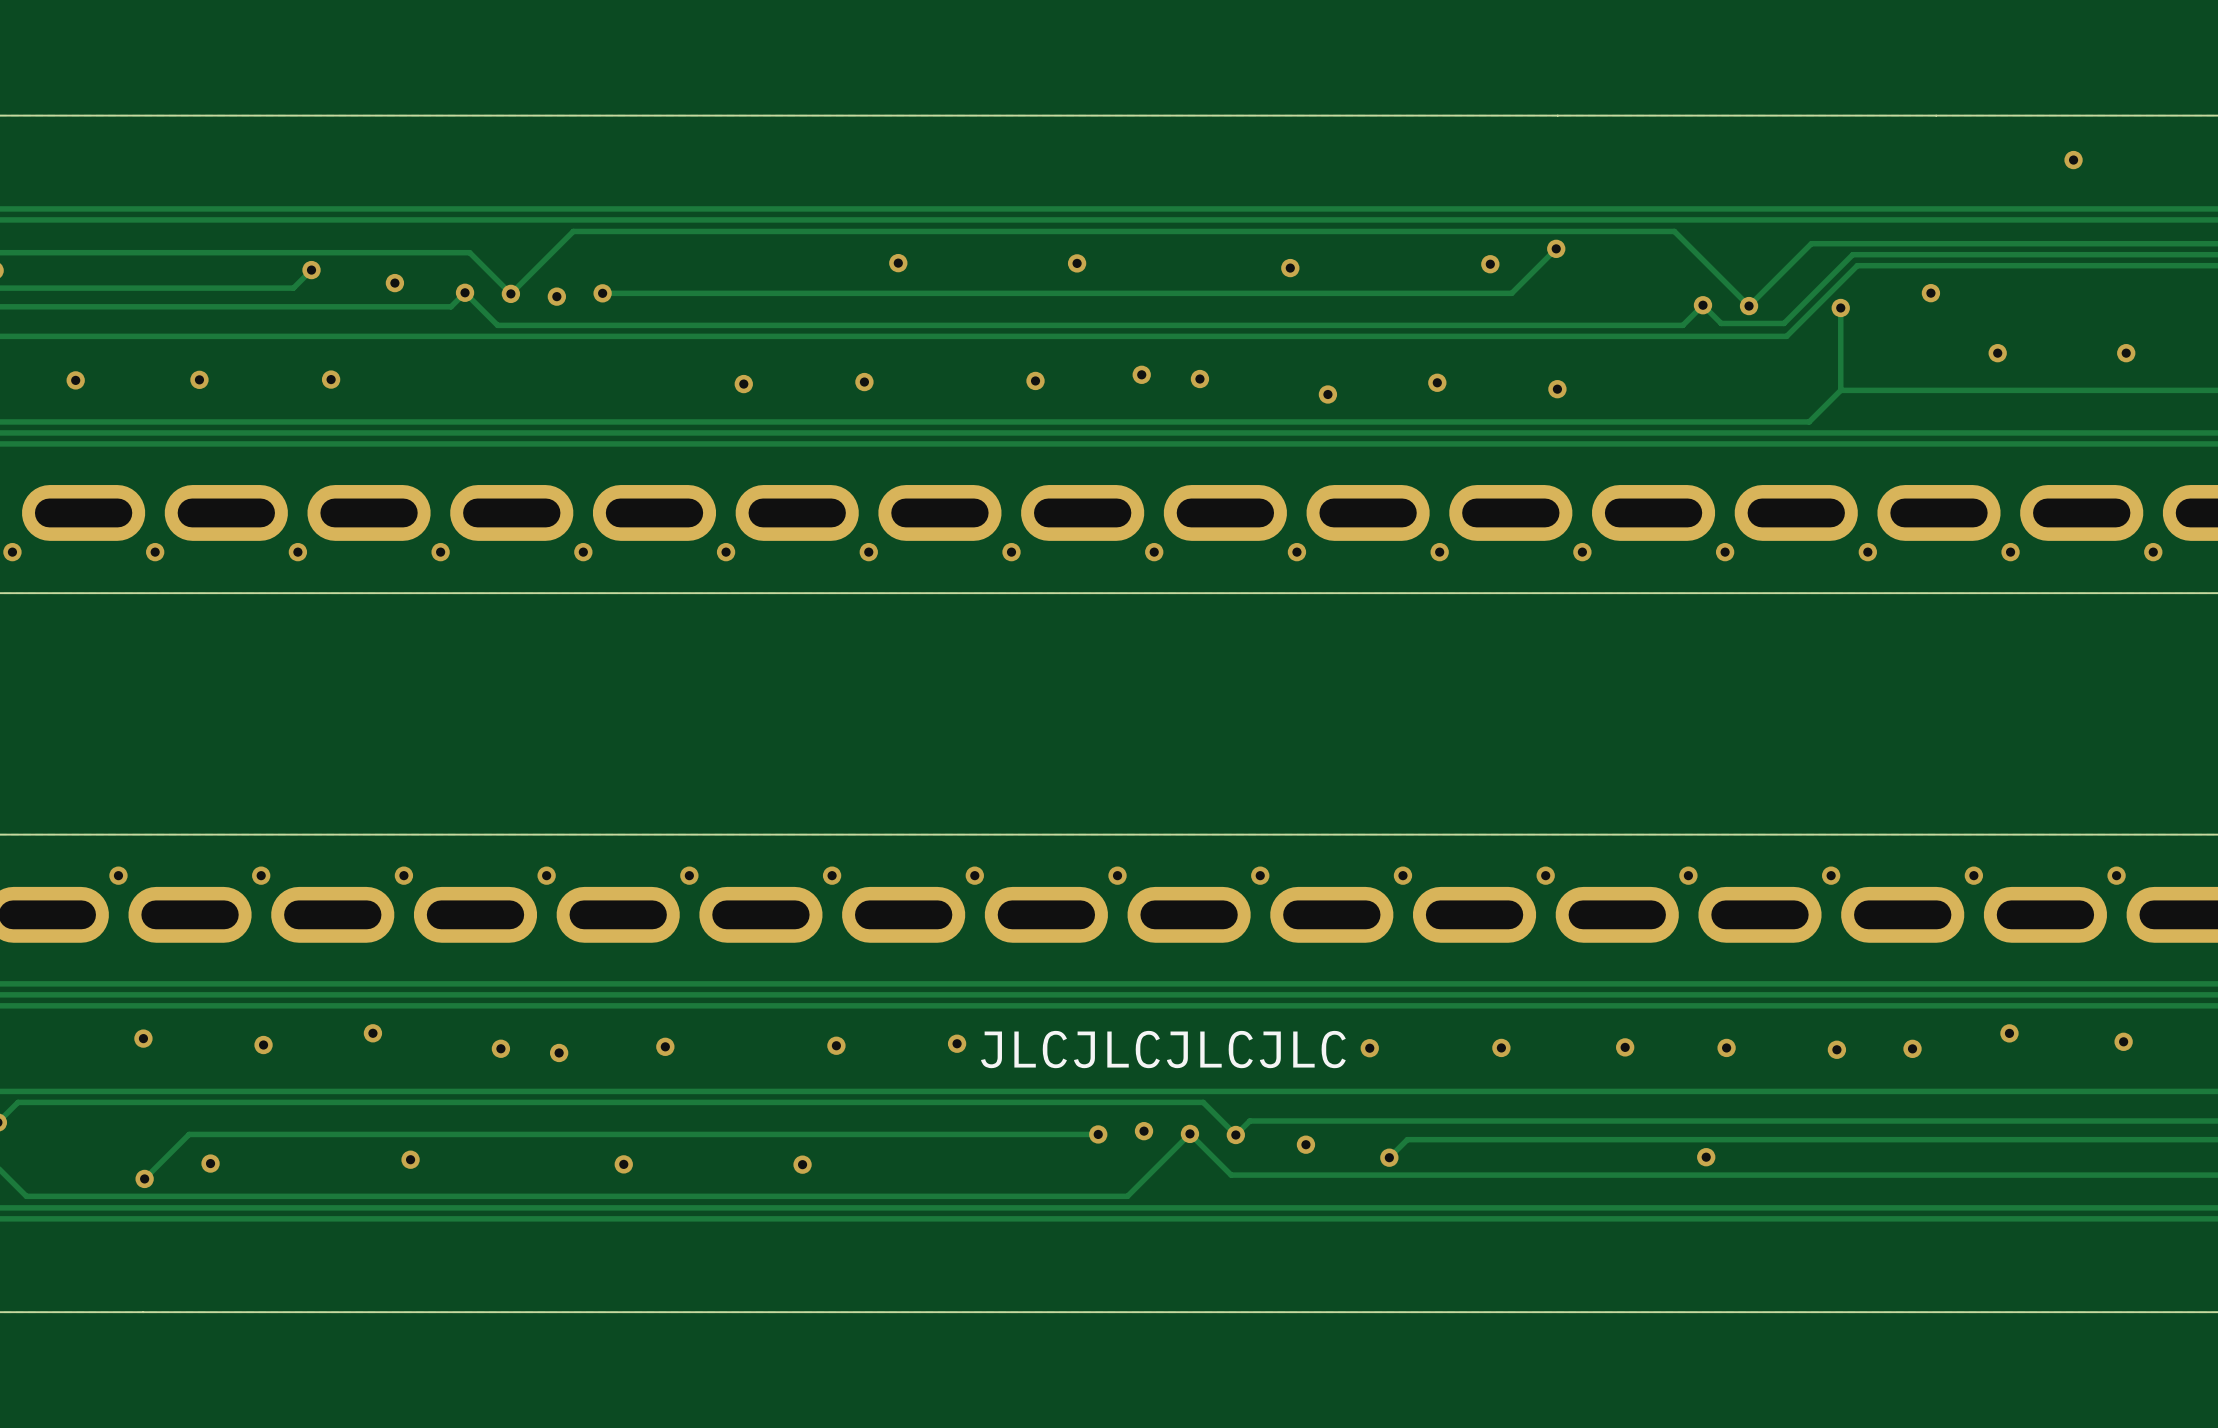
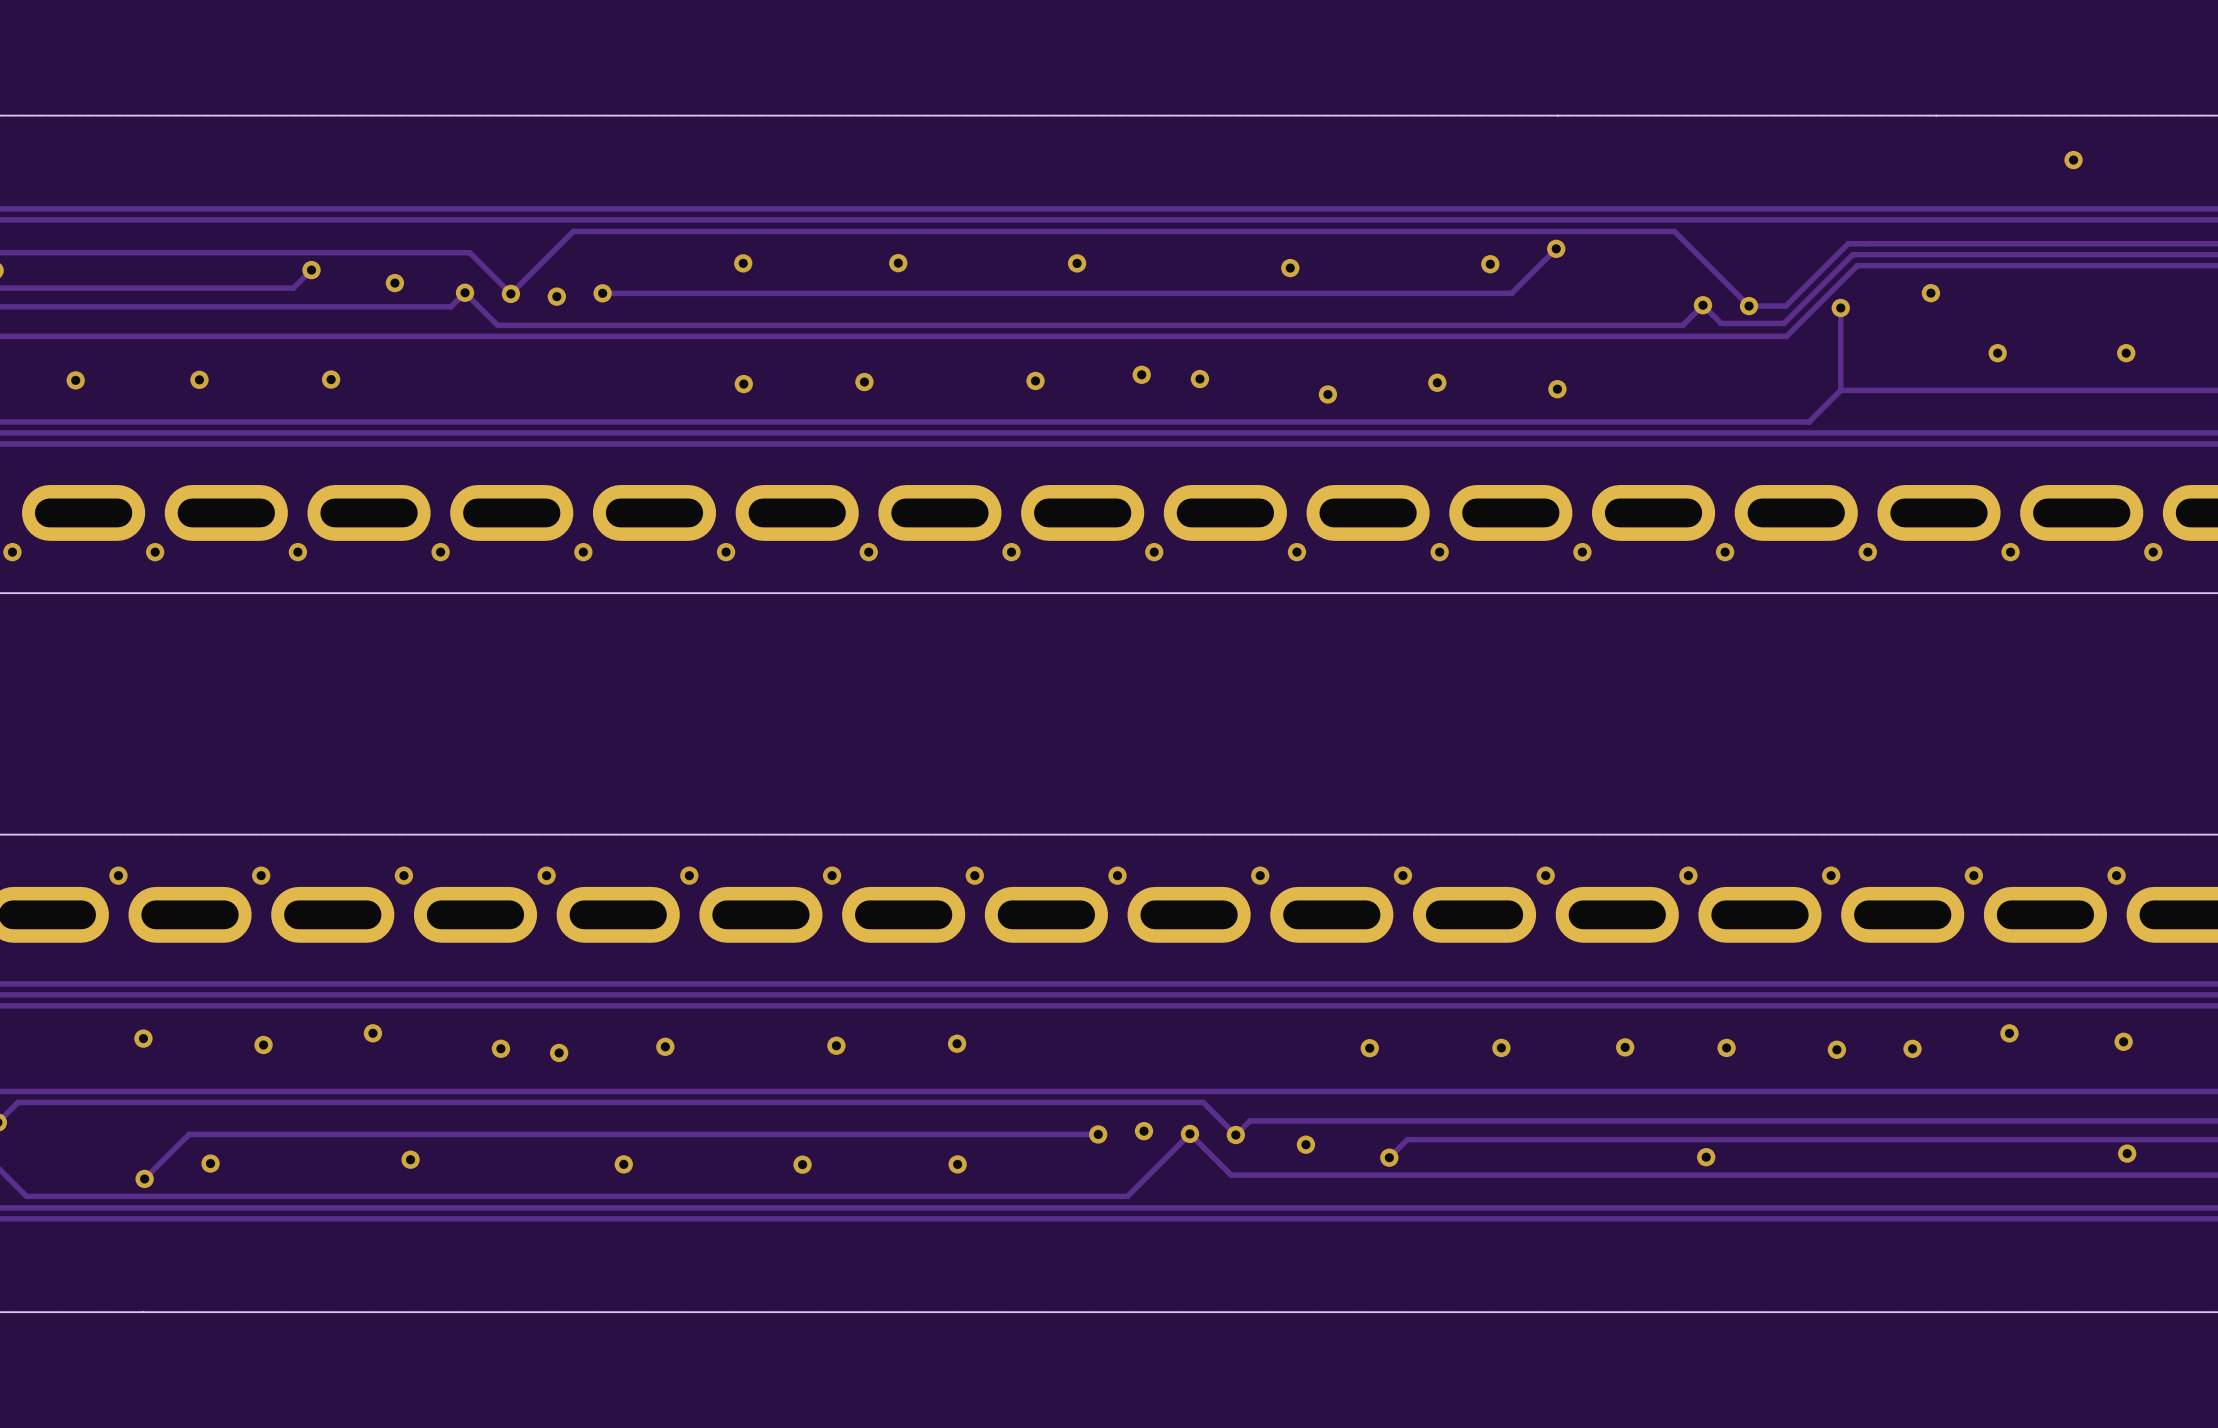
track: (1848, 243) (1811, 243) (1749, 306) -> (1848, 243) (1785, 306) (1749, 306)
via: none -> (743, 263)
text: JLCJLCJLCJLC (1163, 1049) -> none
via: none -> (2127, 1153)
via: none -> (957, 1164)

